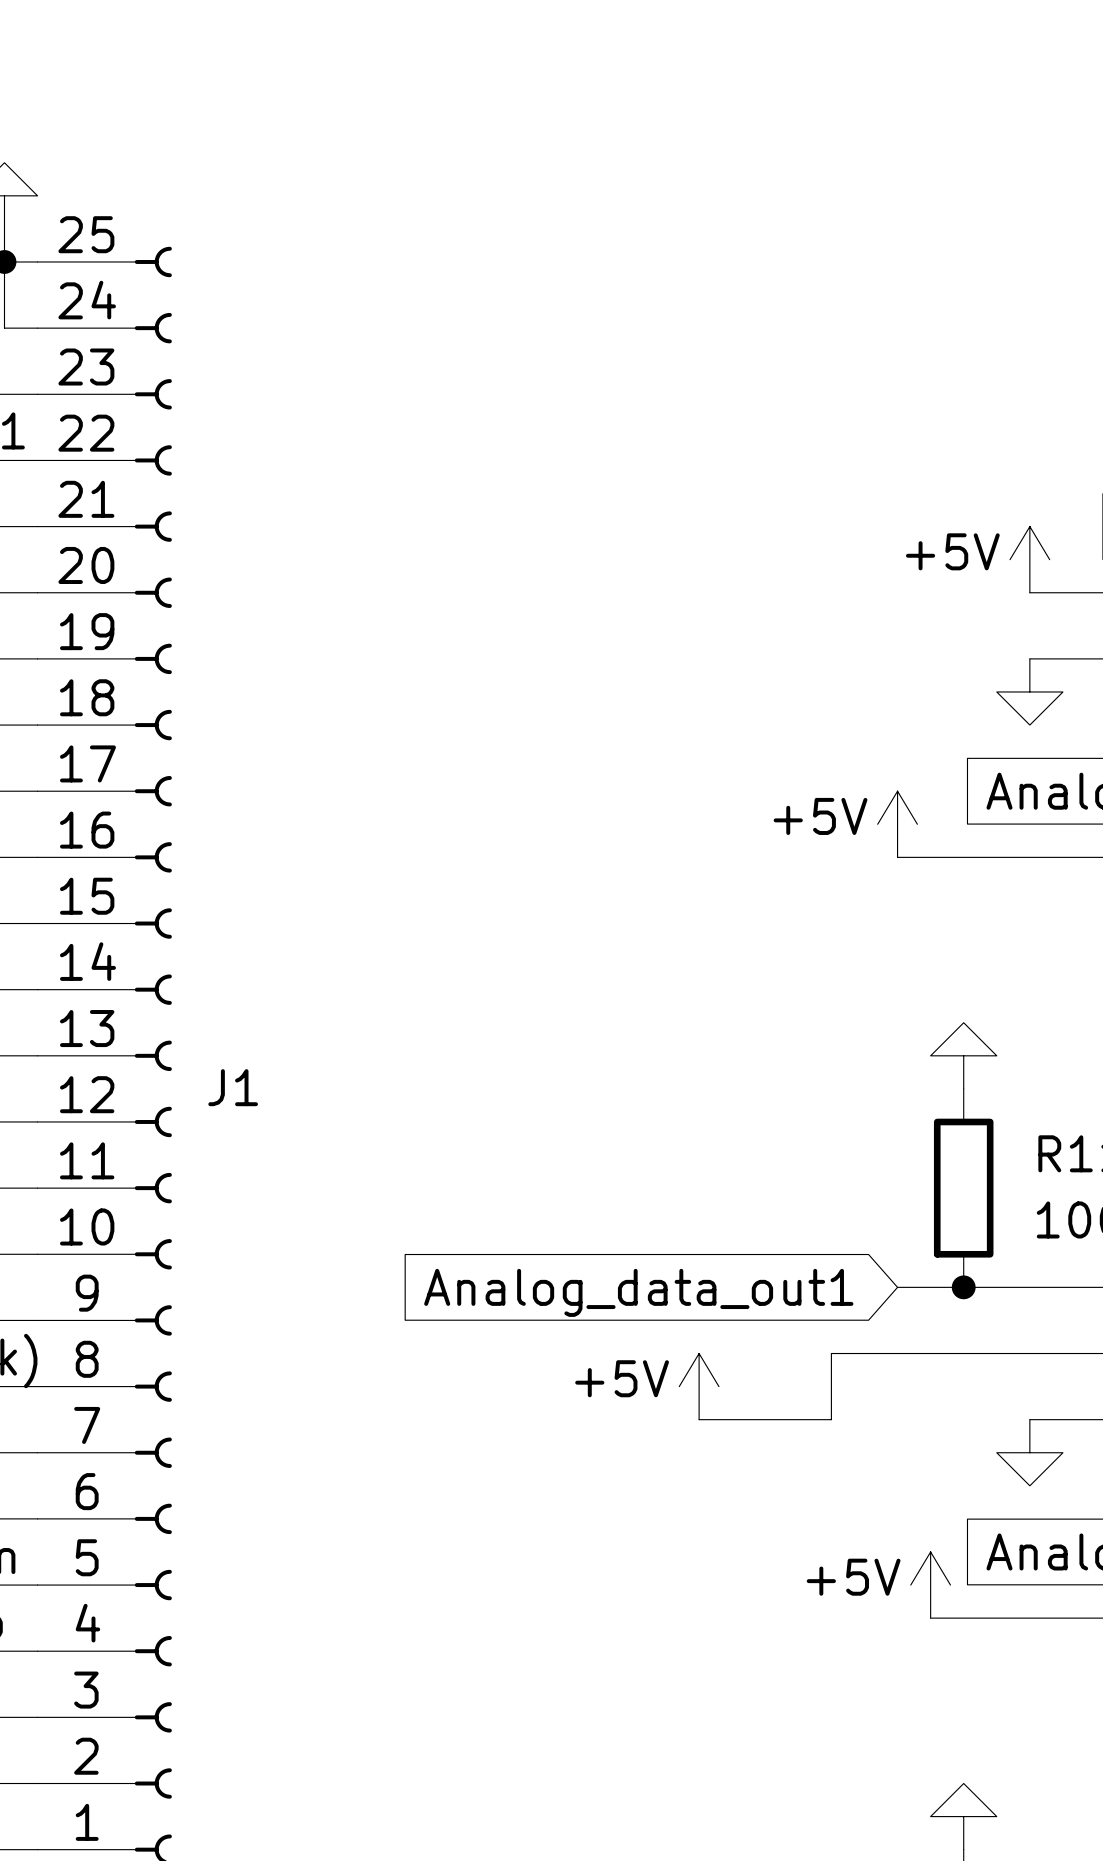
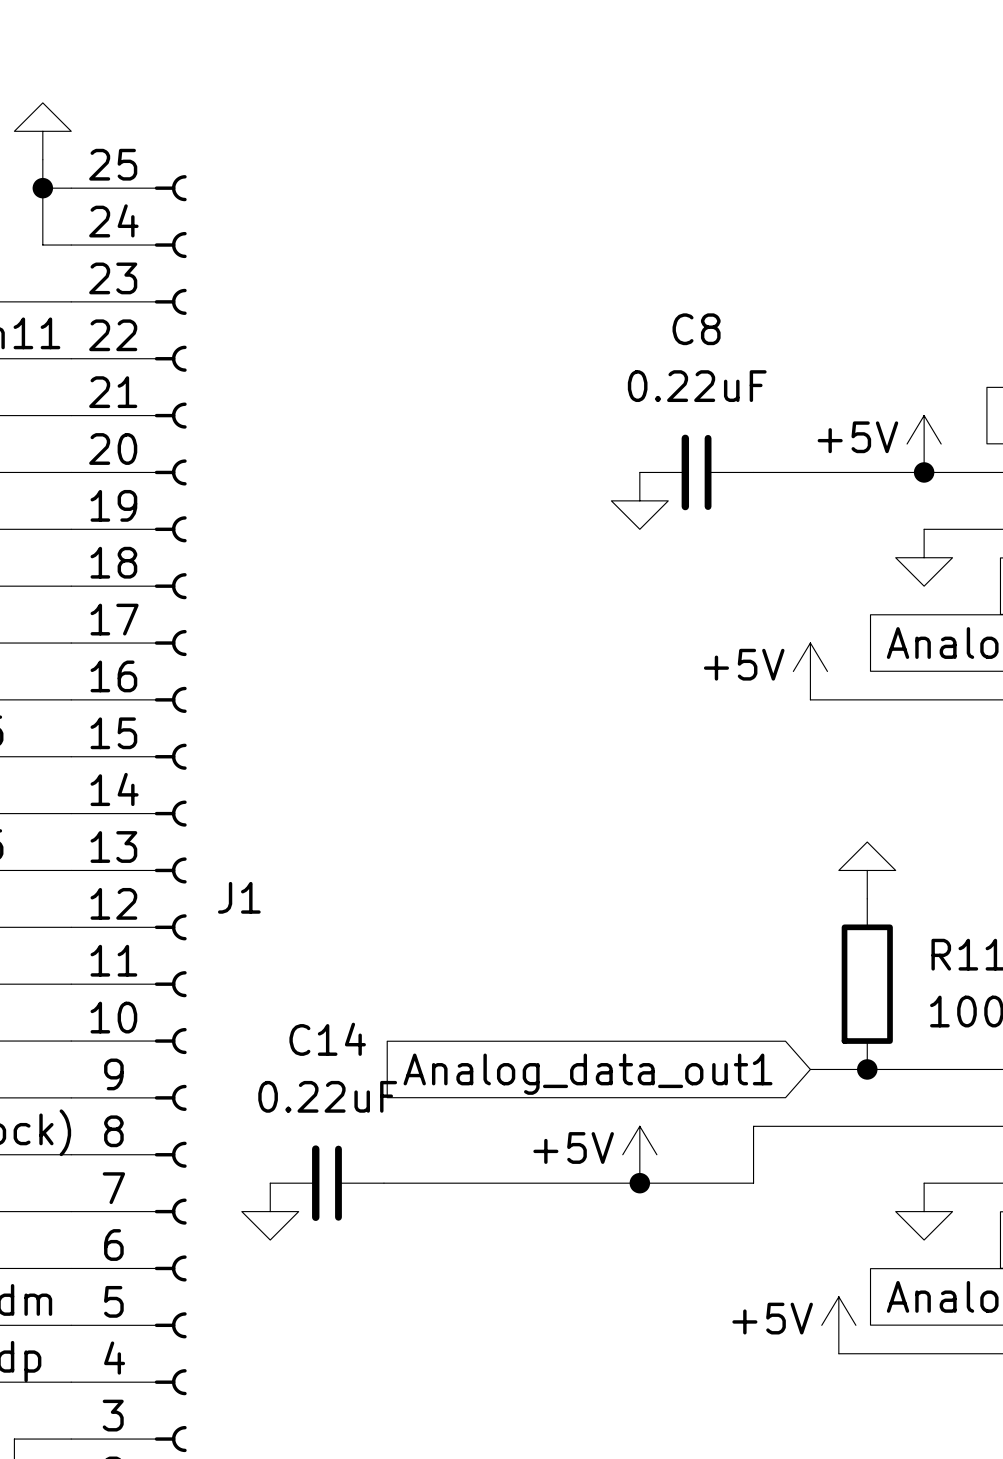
C8: none -> (696, 472)
wire: none -> (753, 472) (924, 472)
junction: none -> (924, 472)
power symbol: none -> (639, 500)
C14: none -> (327, 1183)
wire: none -> (383, 1183) (639, 1183)
junction: none -> (639, 1183)
power symbol: none -> (270, 1211)

